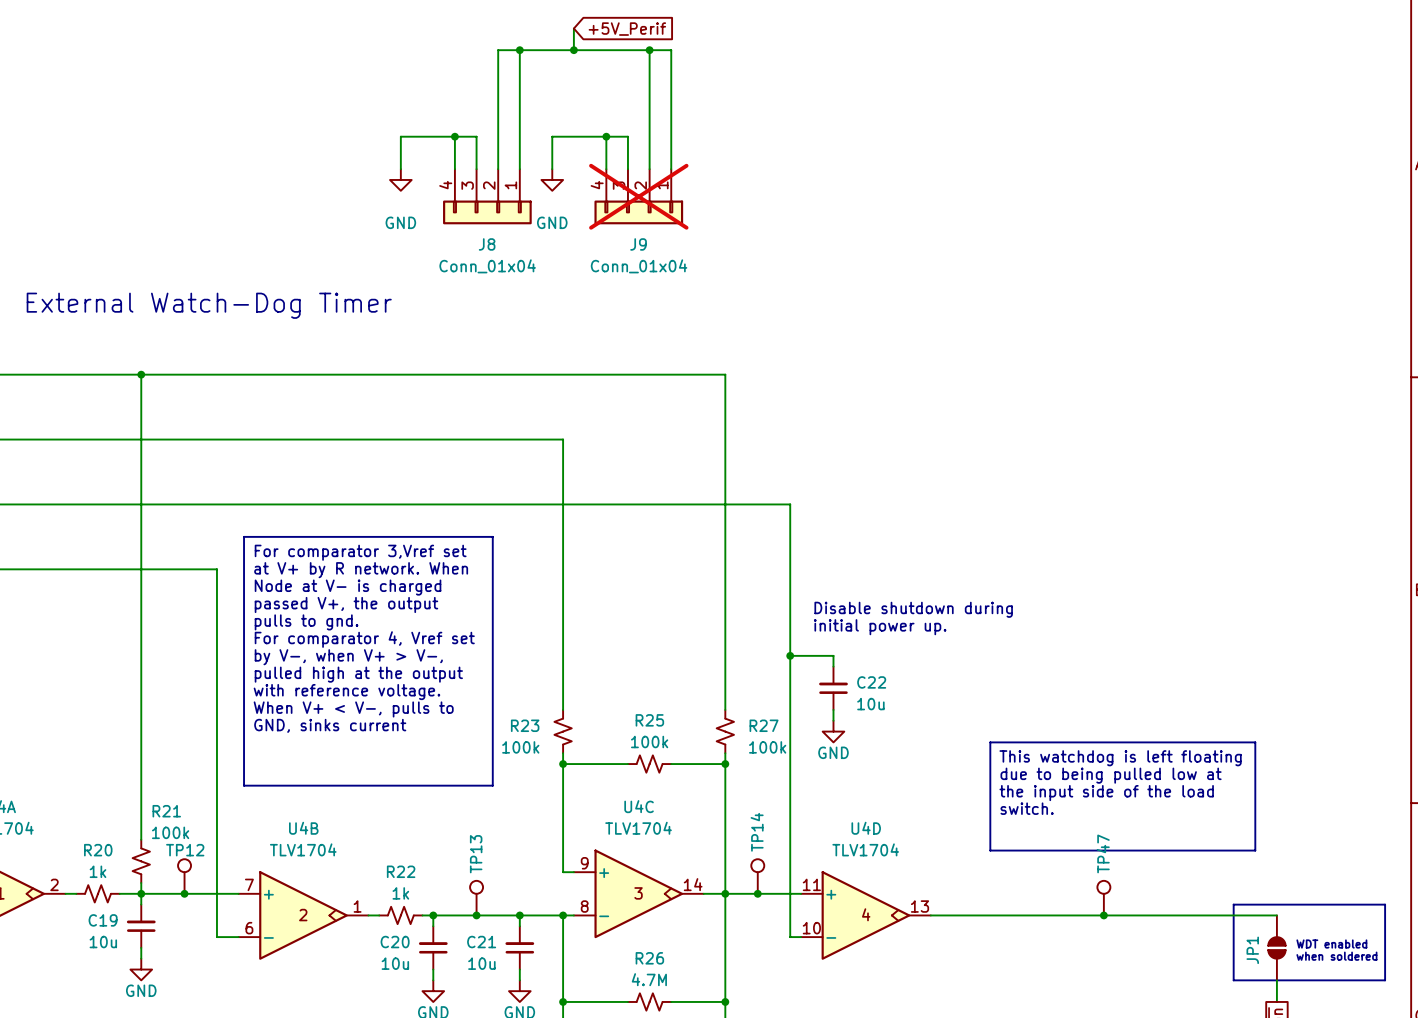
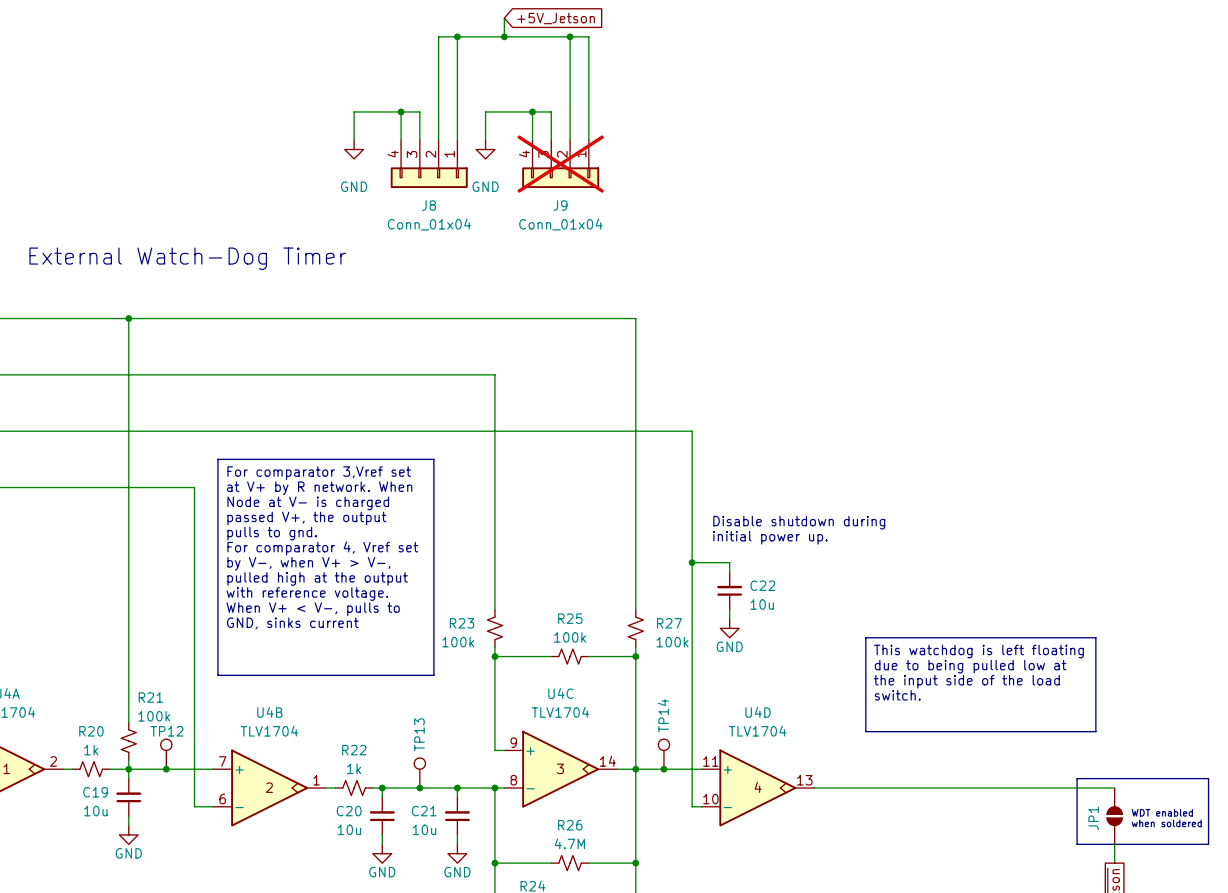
global label: +5V_Perif (627, 29) -> +5V_Jetson (556, 18)
TP47: (1103, 898) -> none
junction: (1103, 915) -> none

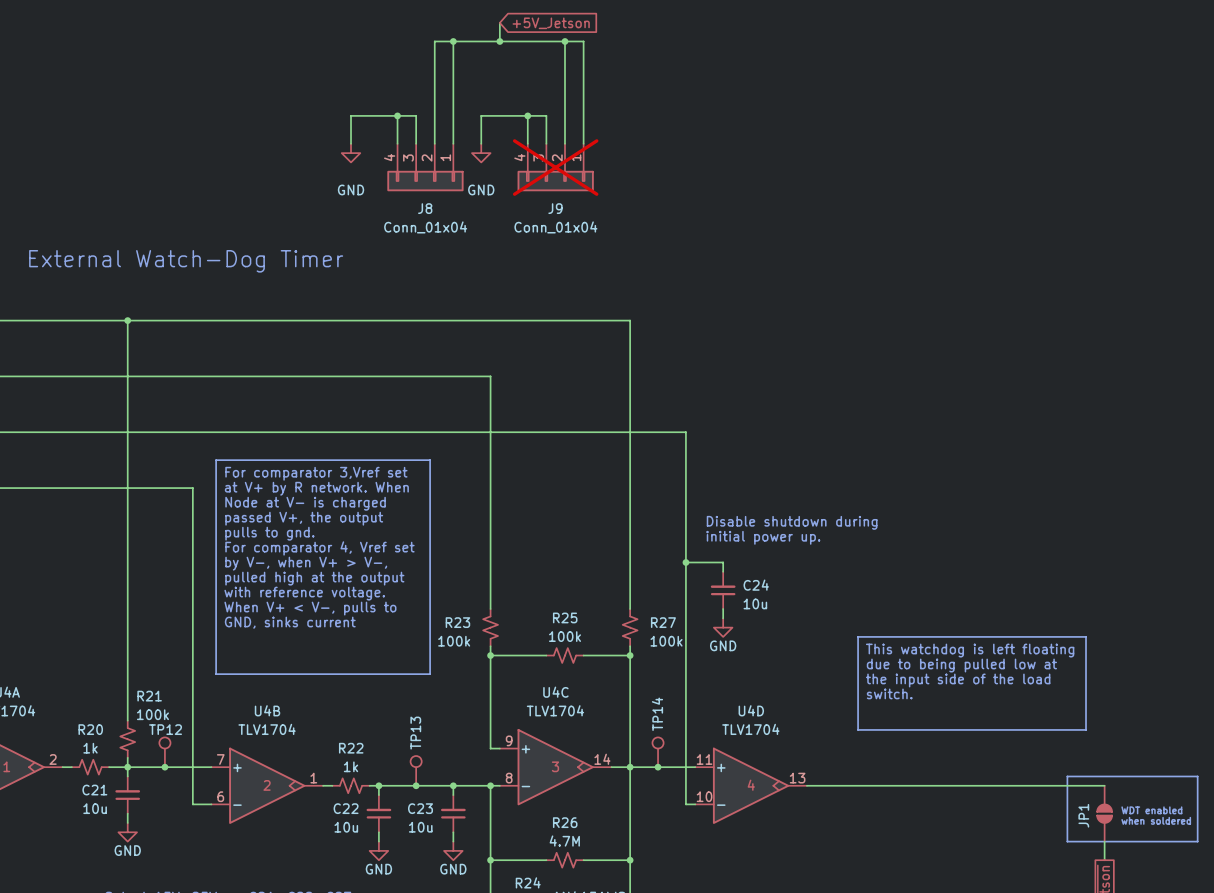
C22 name: C22 (762, 585) -> C24 (756, 585)
C19 name: C19 (95, 792) -> C21 (94, 790)
C20 name: C20 (349, 811) -> C22 (346, 808)
C21 name: C21 (424, 811) -> C23 (420, 808)

